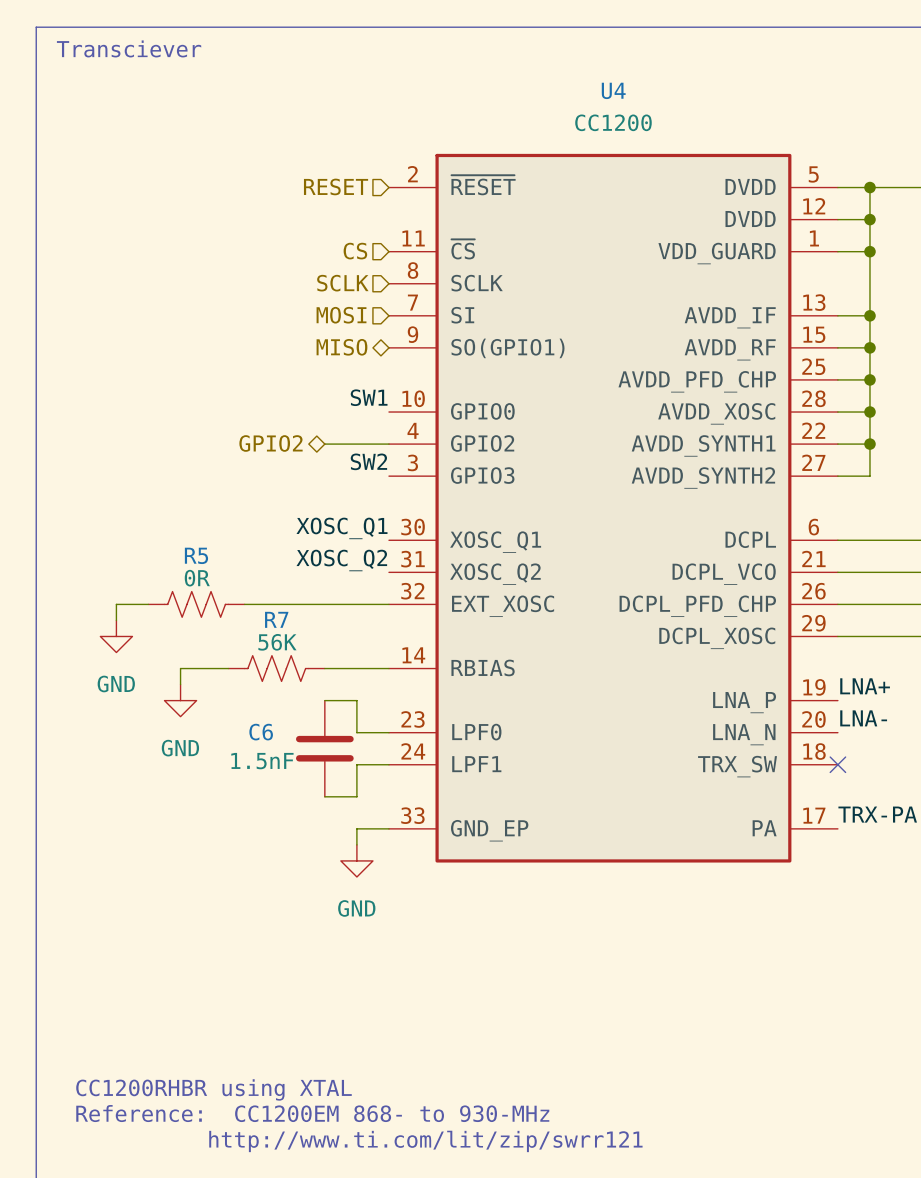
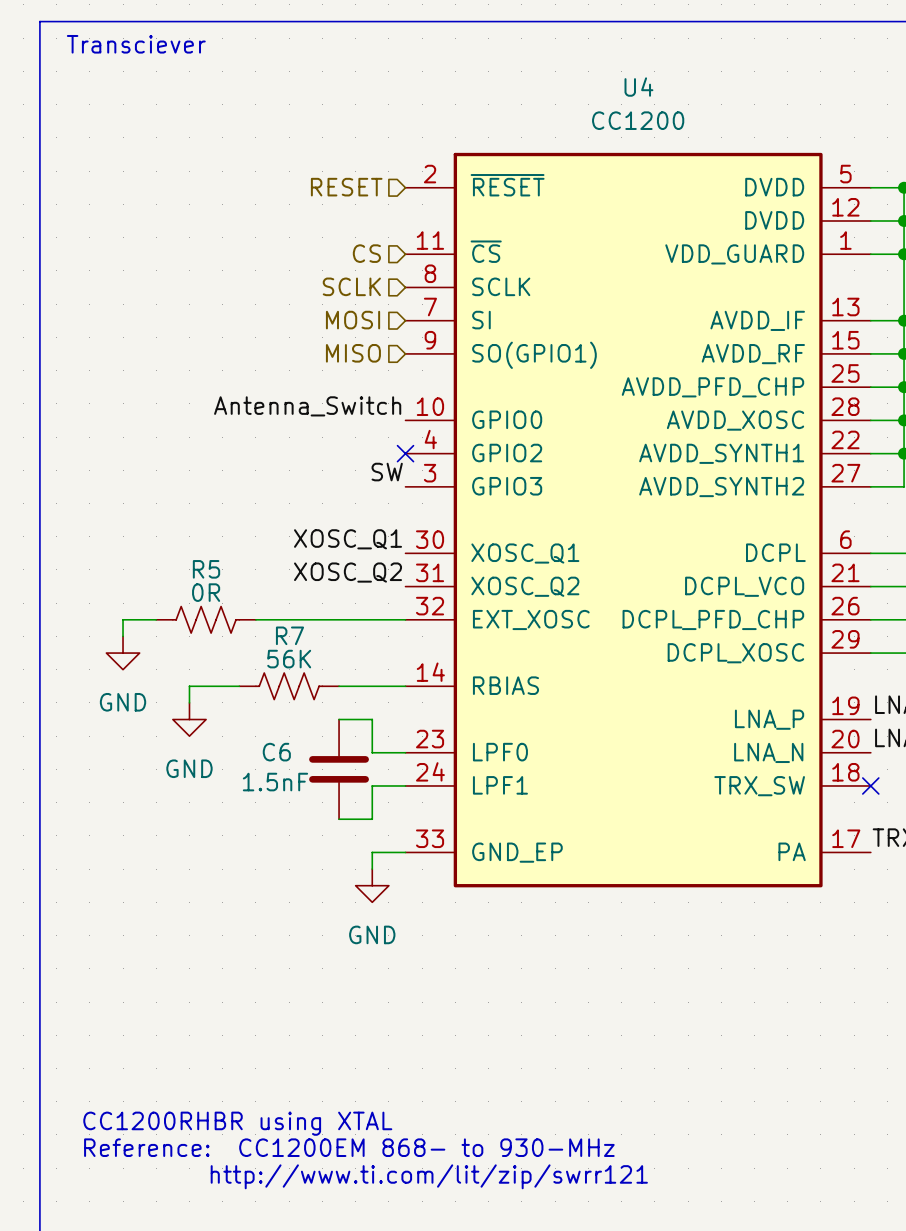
hierarchical label shape: bidirectional (341, 347) -> input (353, 353)
label: SW1 (369, 397) -> Antenna_Switch (307, 406)
hierarchical label: GPIO2 (271, 443) -> none
wire: (324, 444) (388, 444) -> none
no-connect mark: none -> (405, 453)
label: SW2 (368, 461) -> SW (387, 472)

